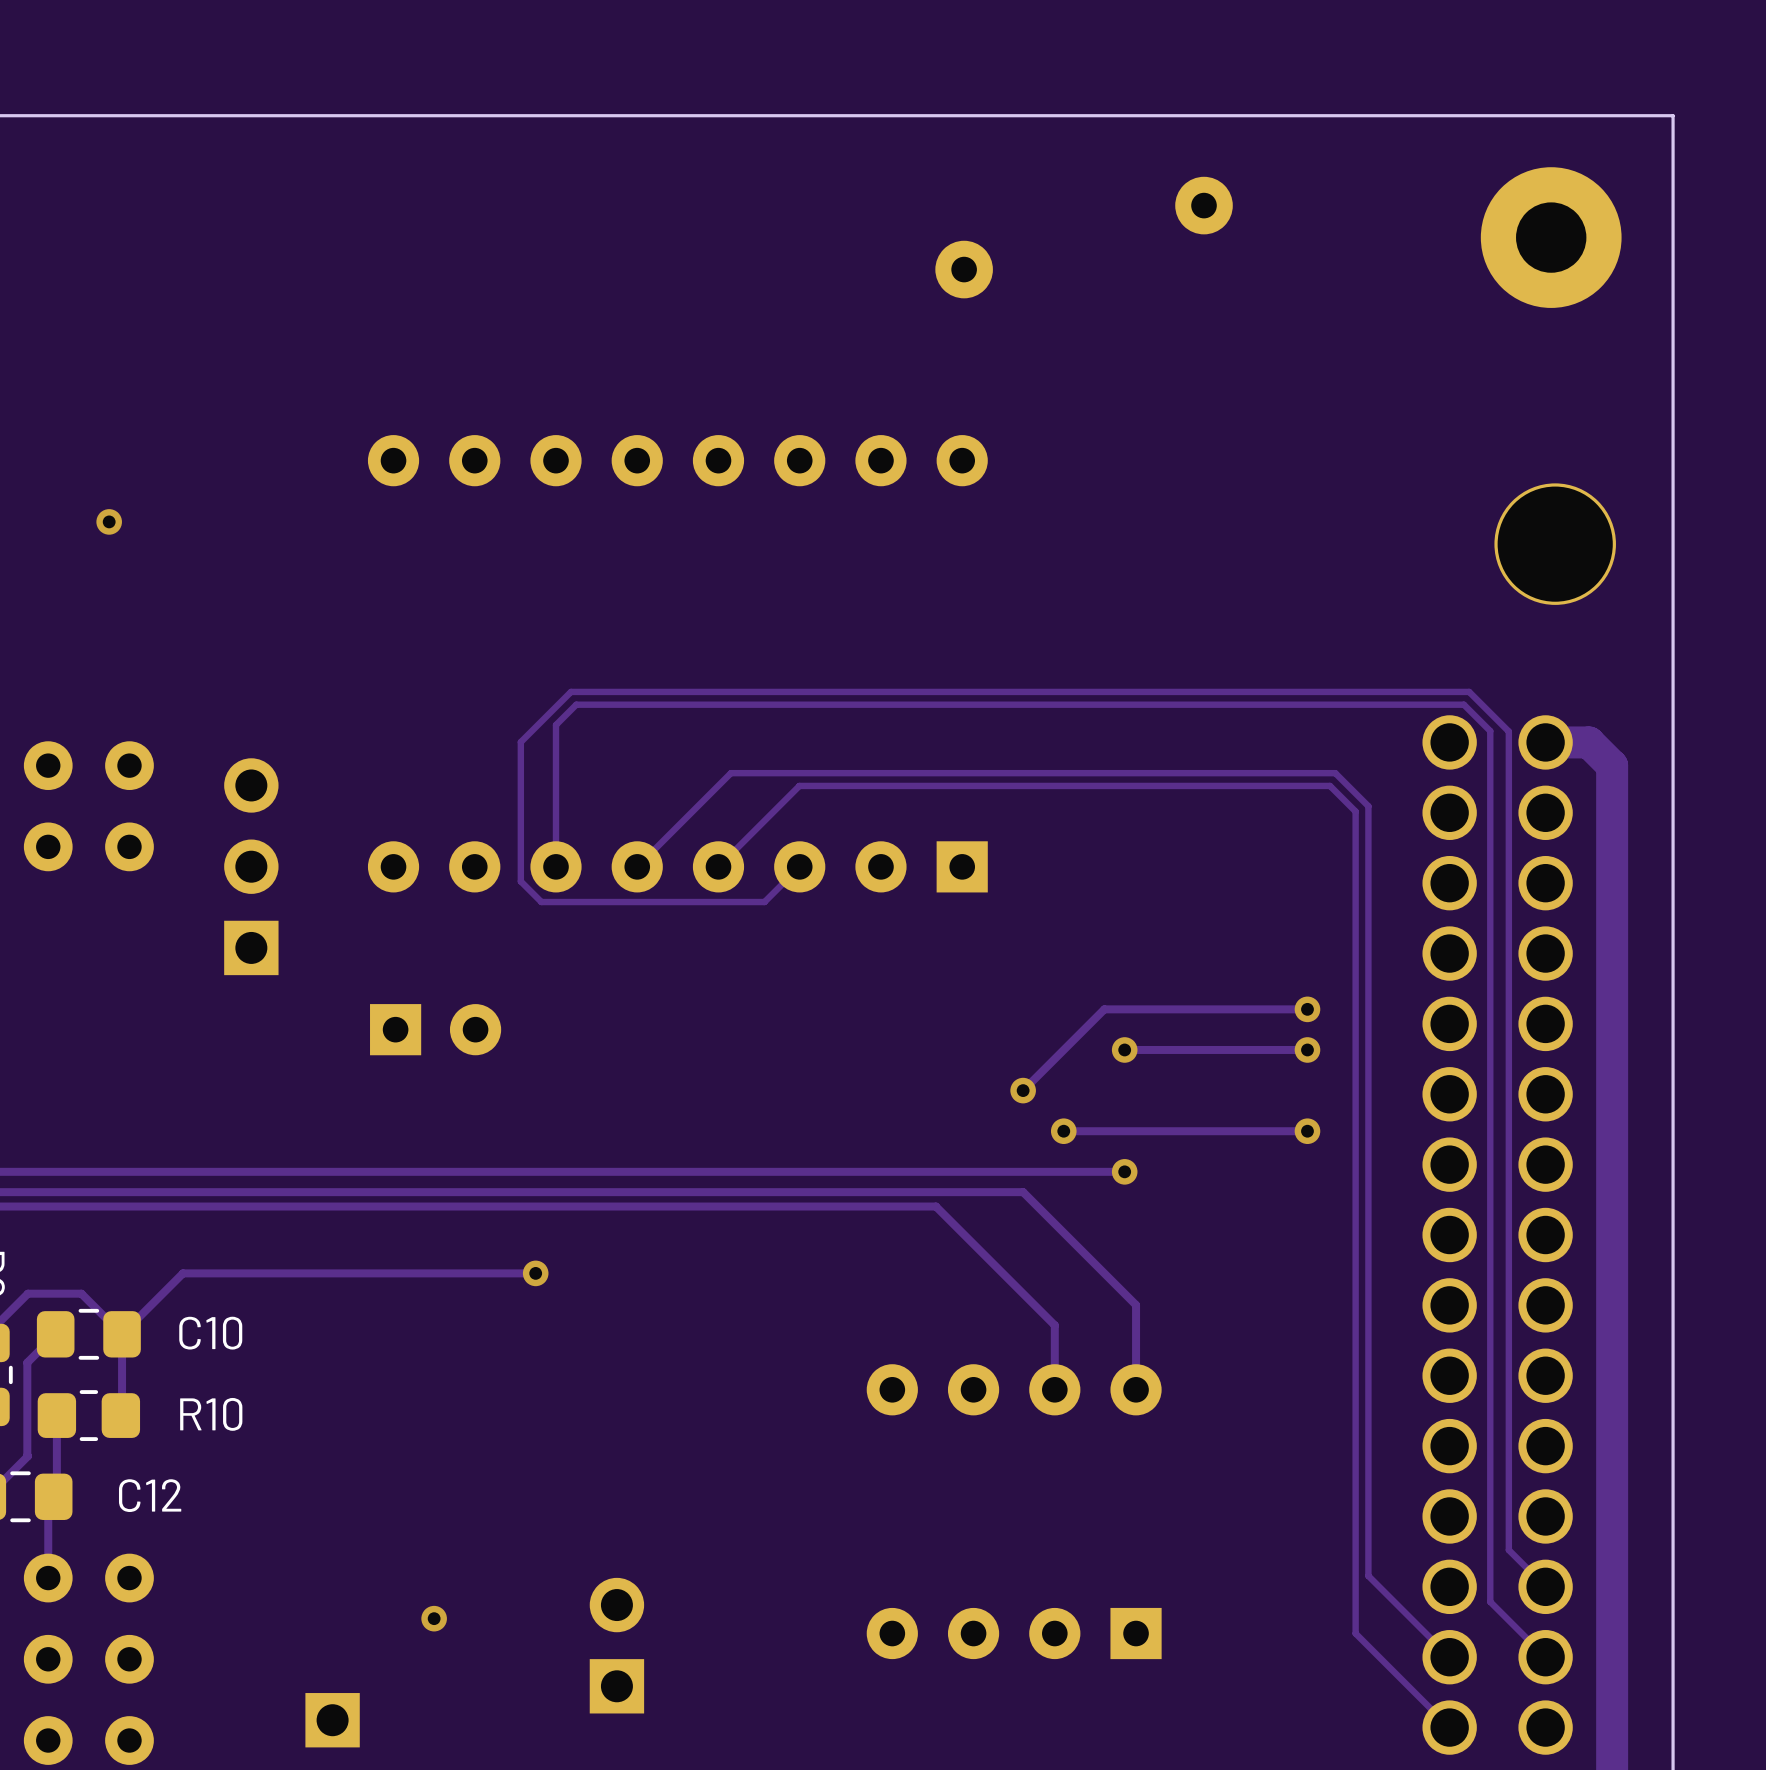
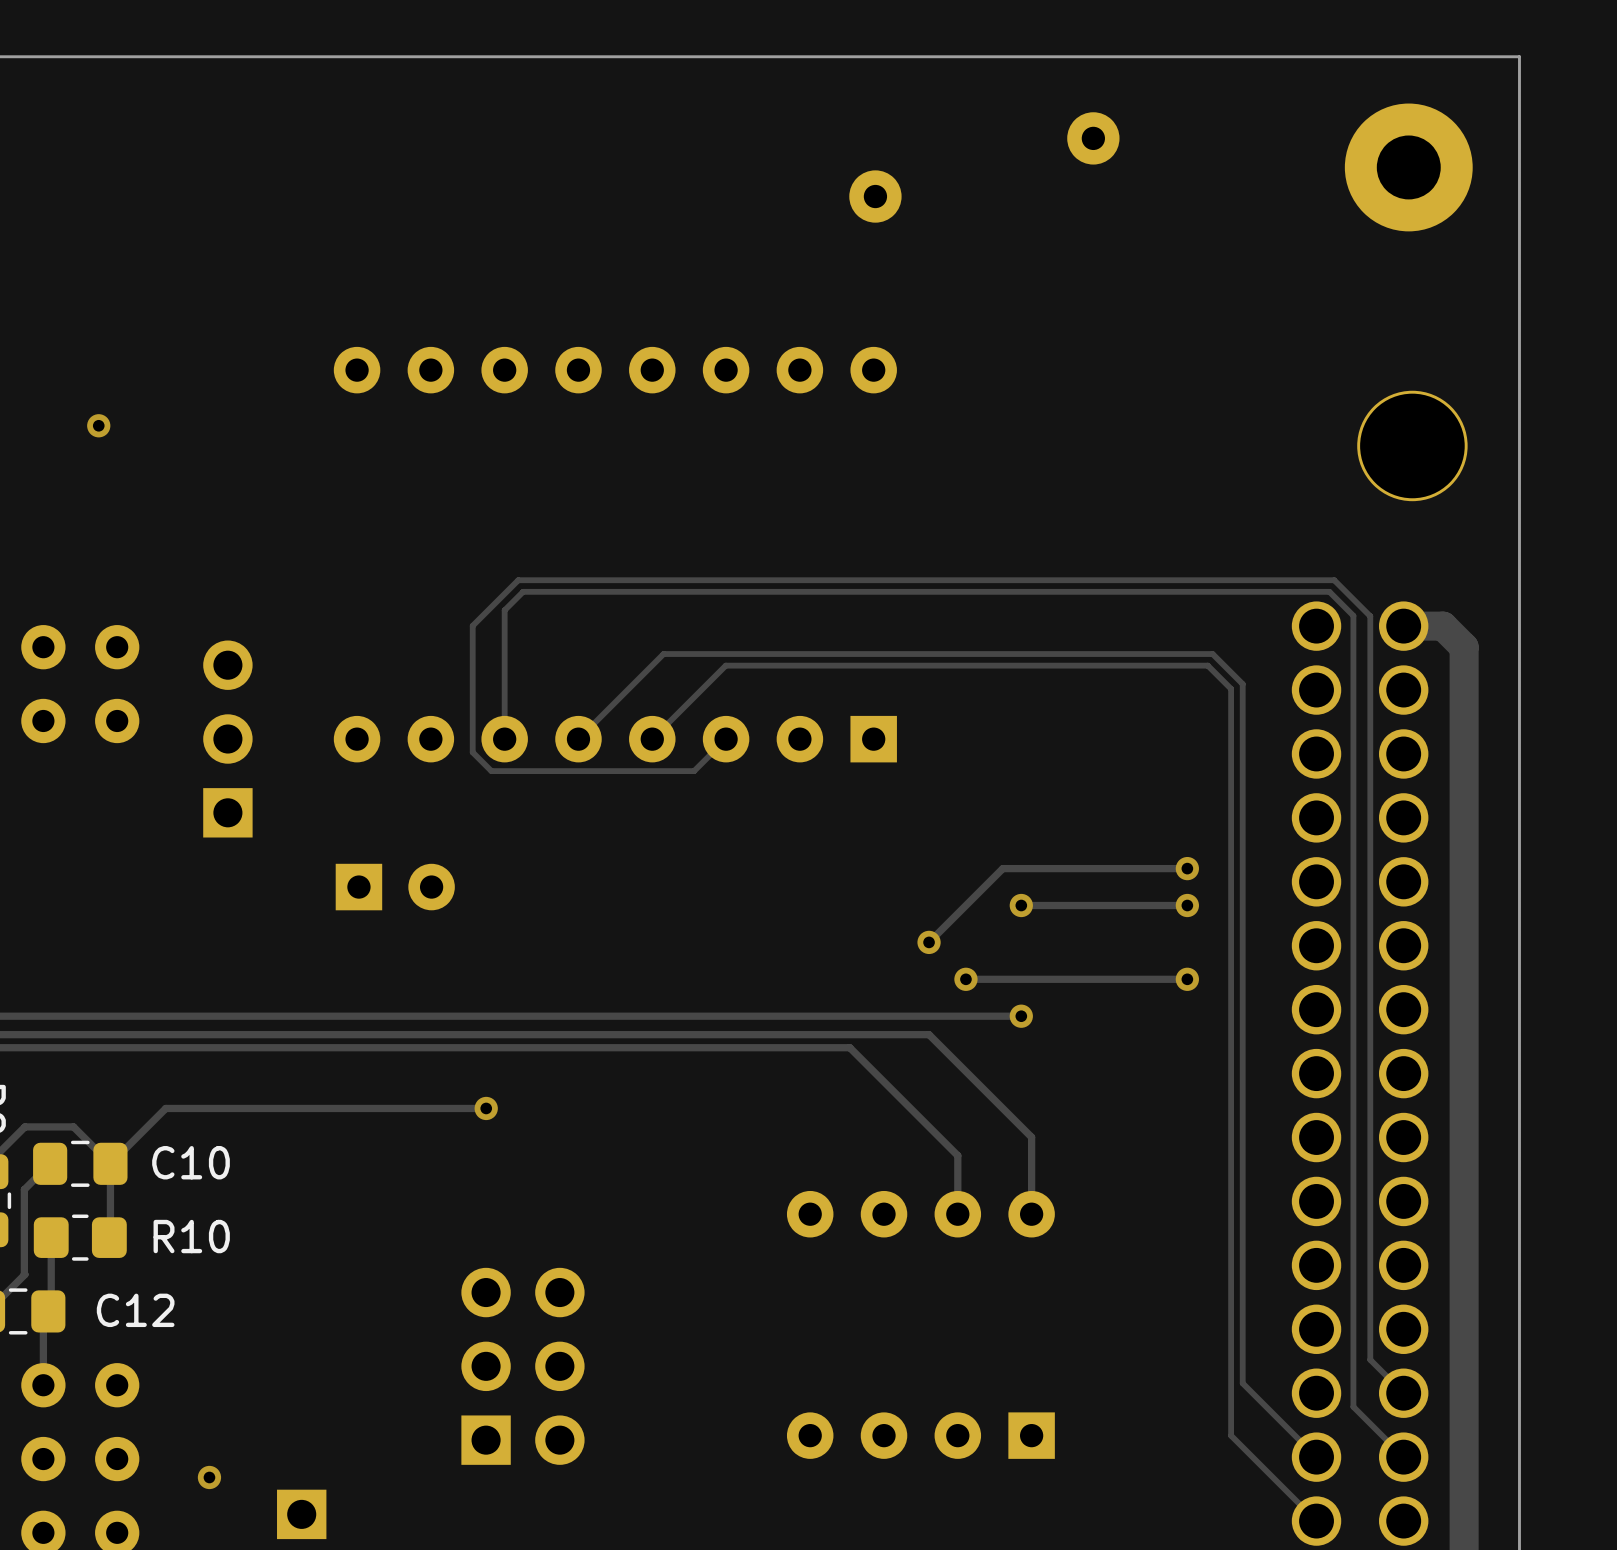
part: none -> (522, 1366)
via: (434, 1618) -> none
part: (616, 1645) -> none
via: none -> (209, 1477)

